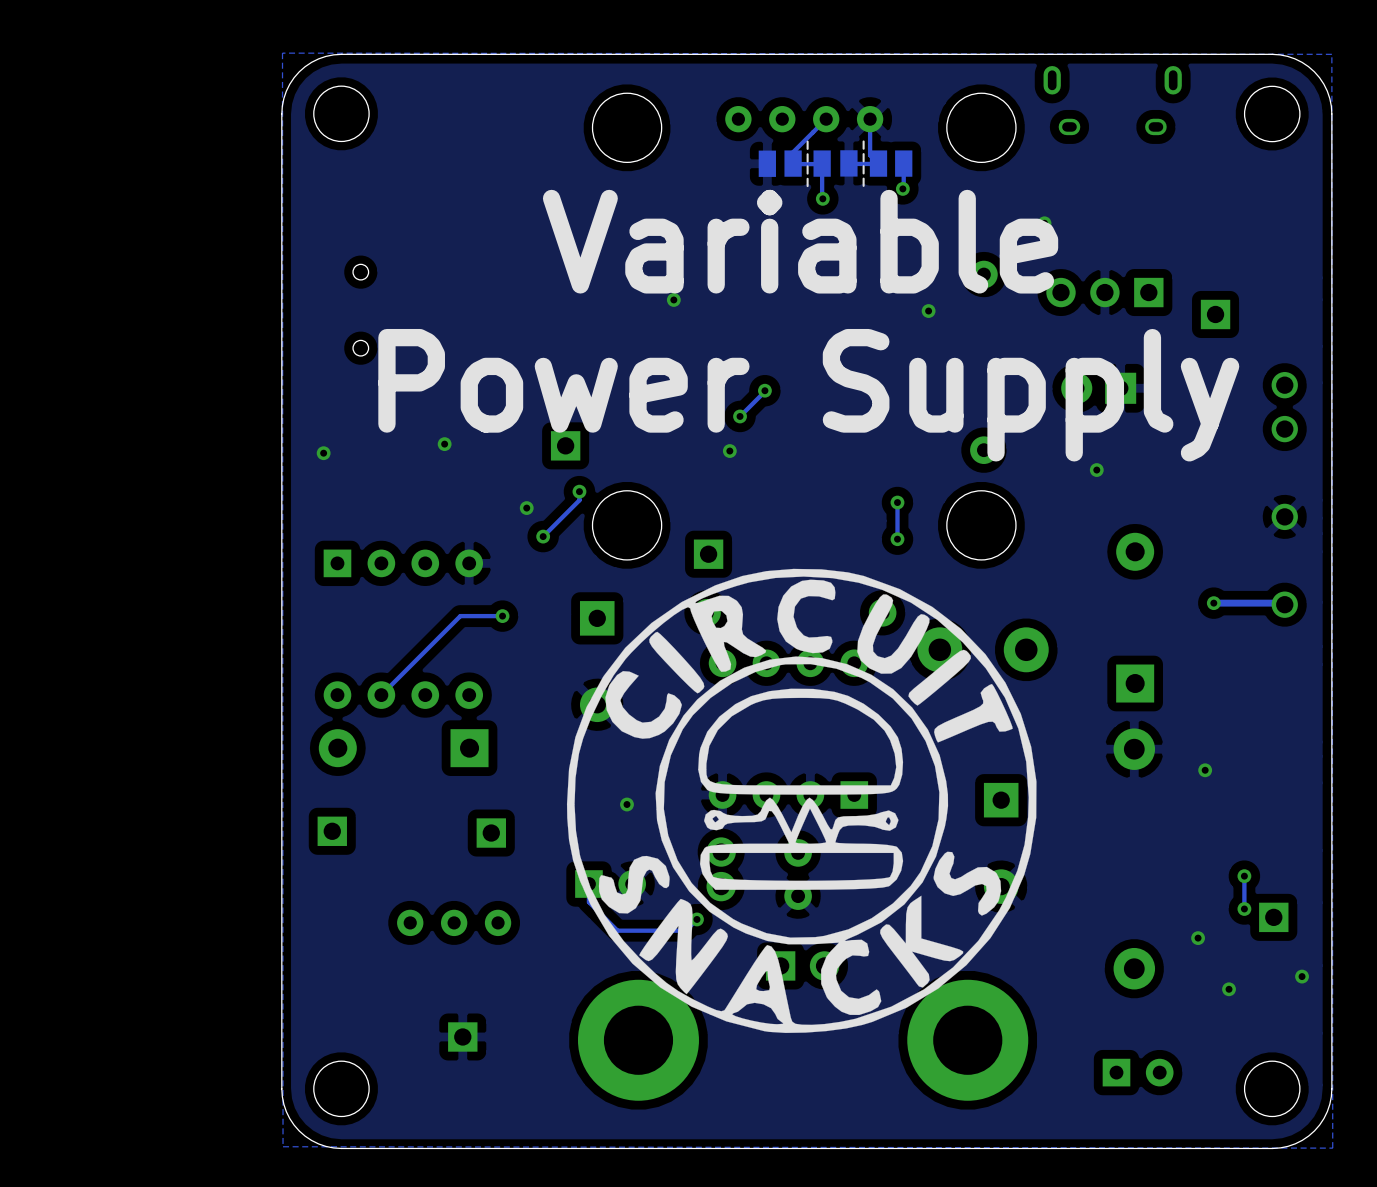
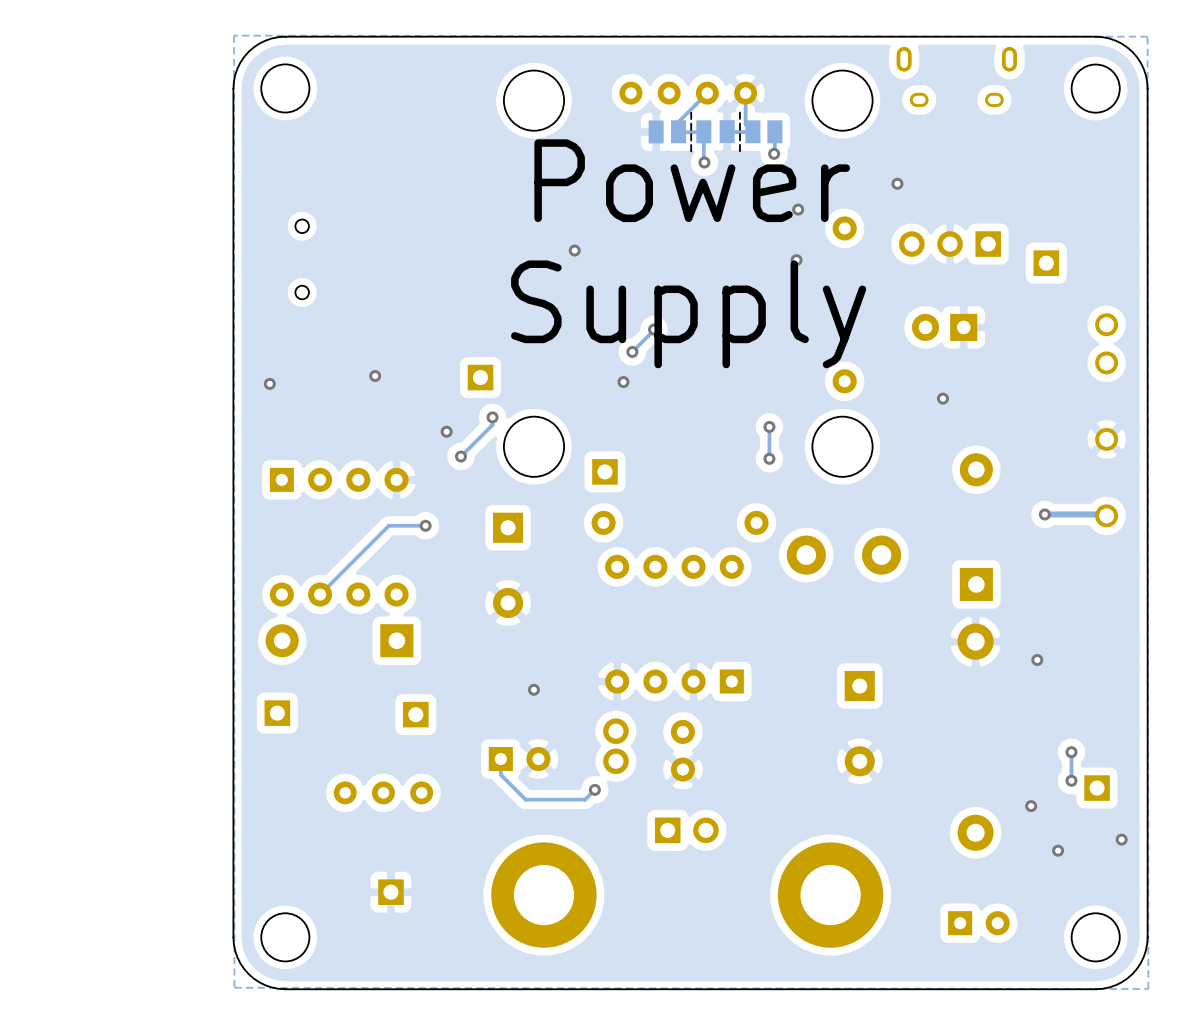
text: none -> Power (692, 180)
text: Variable (800, 241) -> none
text: Power Supply (808, 395) -> Supply (688, 314)
drawing: [566, 568, 1037, 1033] -> none

